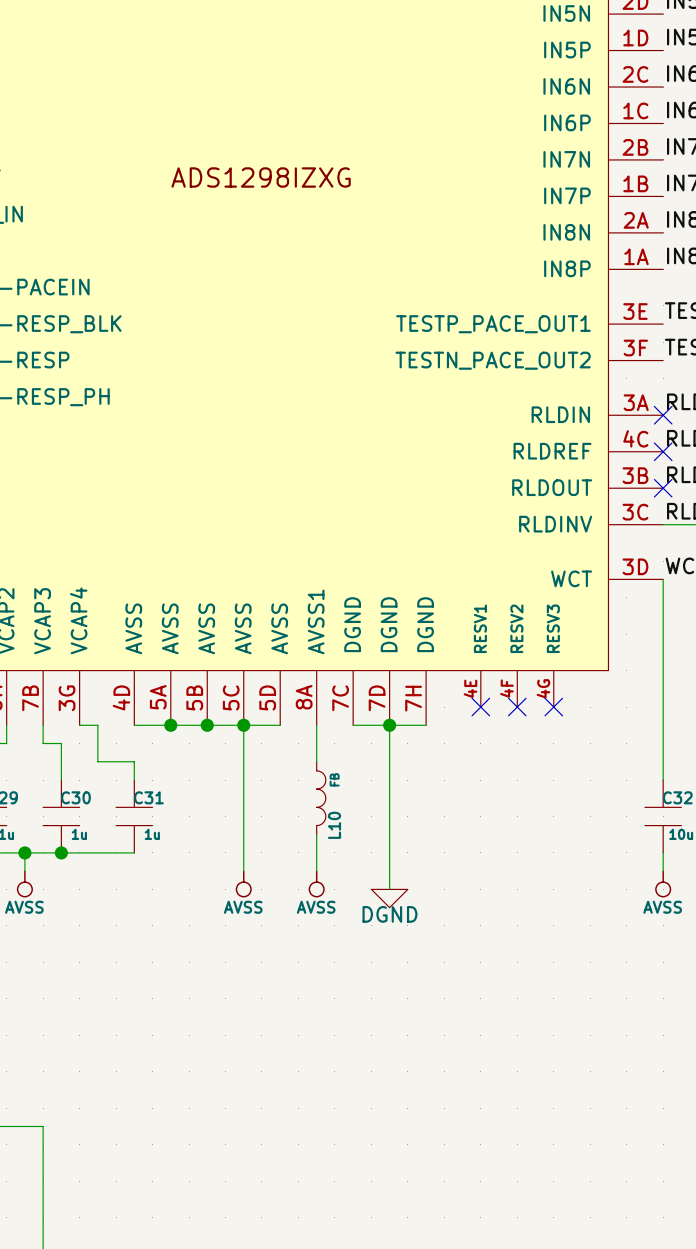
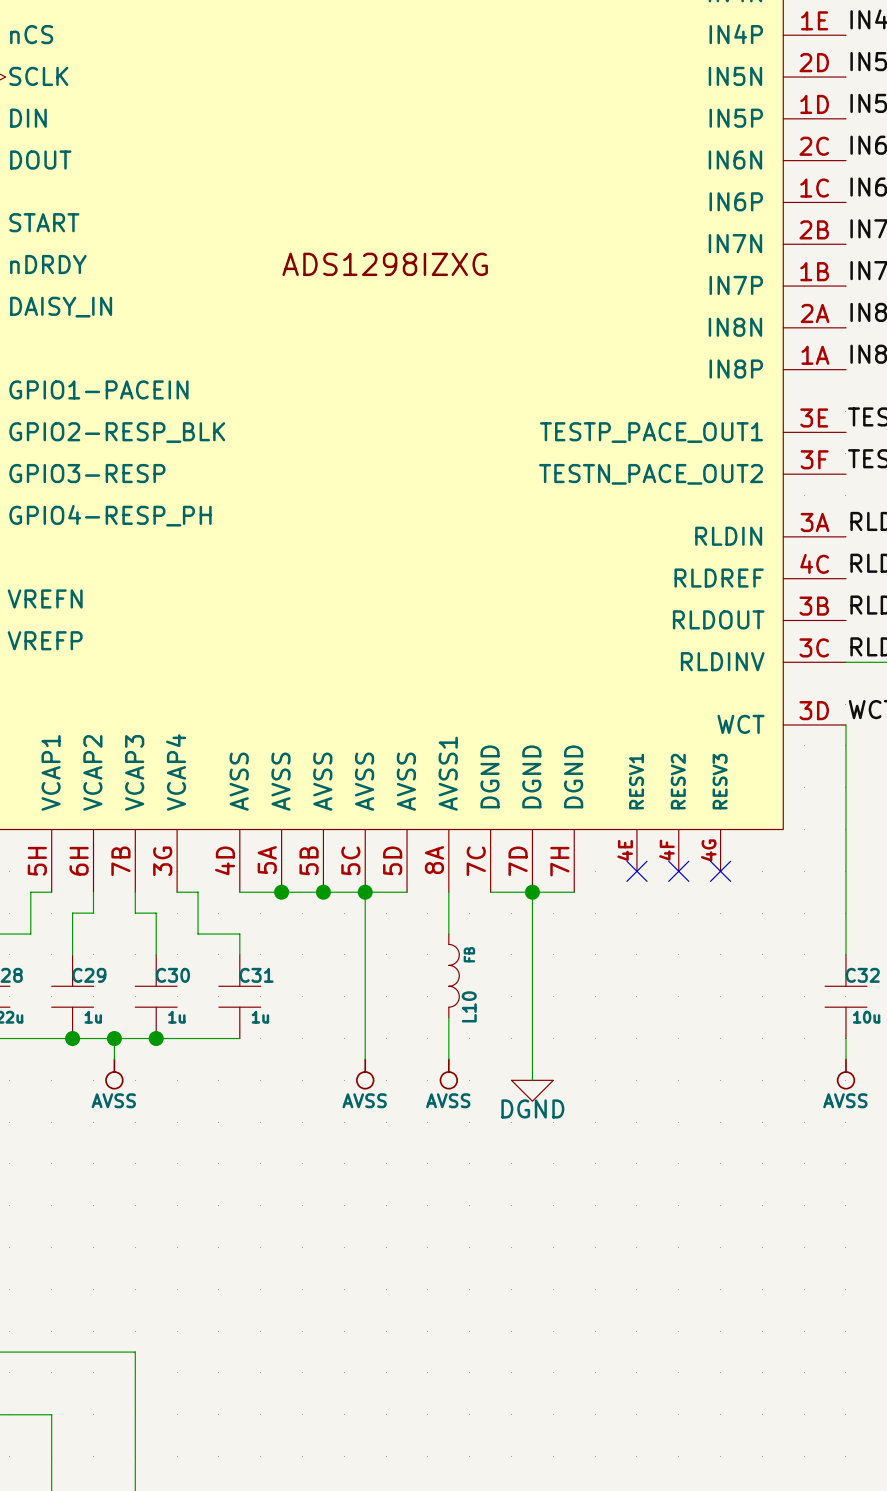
no-connect mark: (663, 415) -> none
no-connect mark: (663, 451) -> none
no-connect mark: (663, 488) -> none

